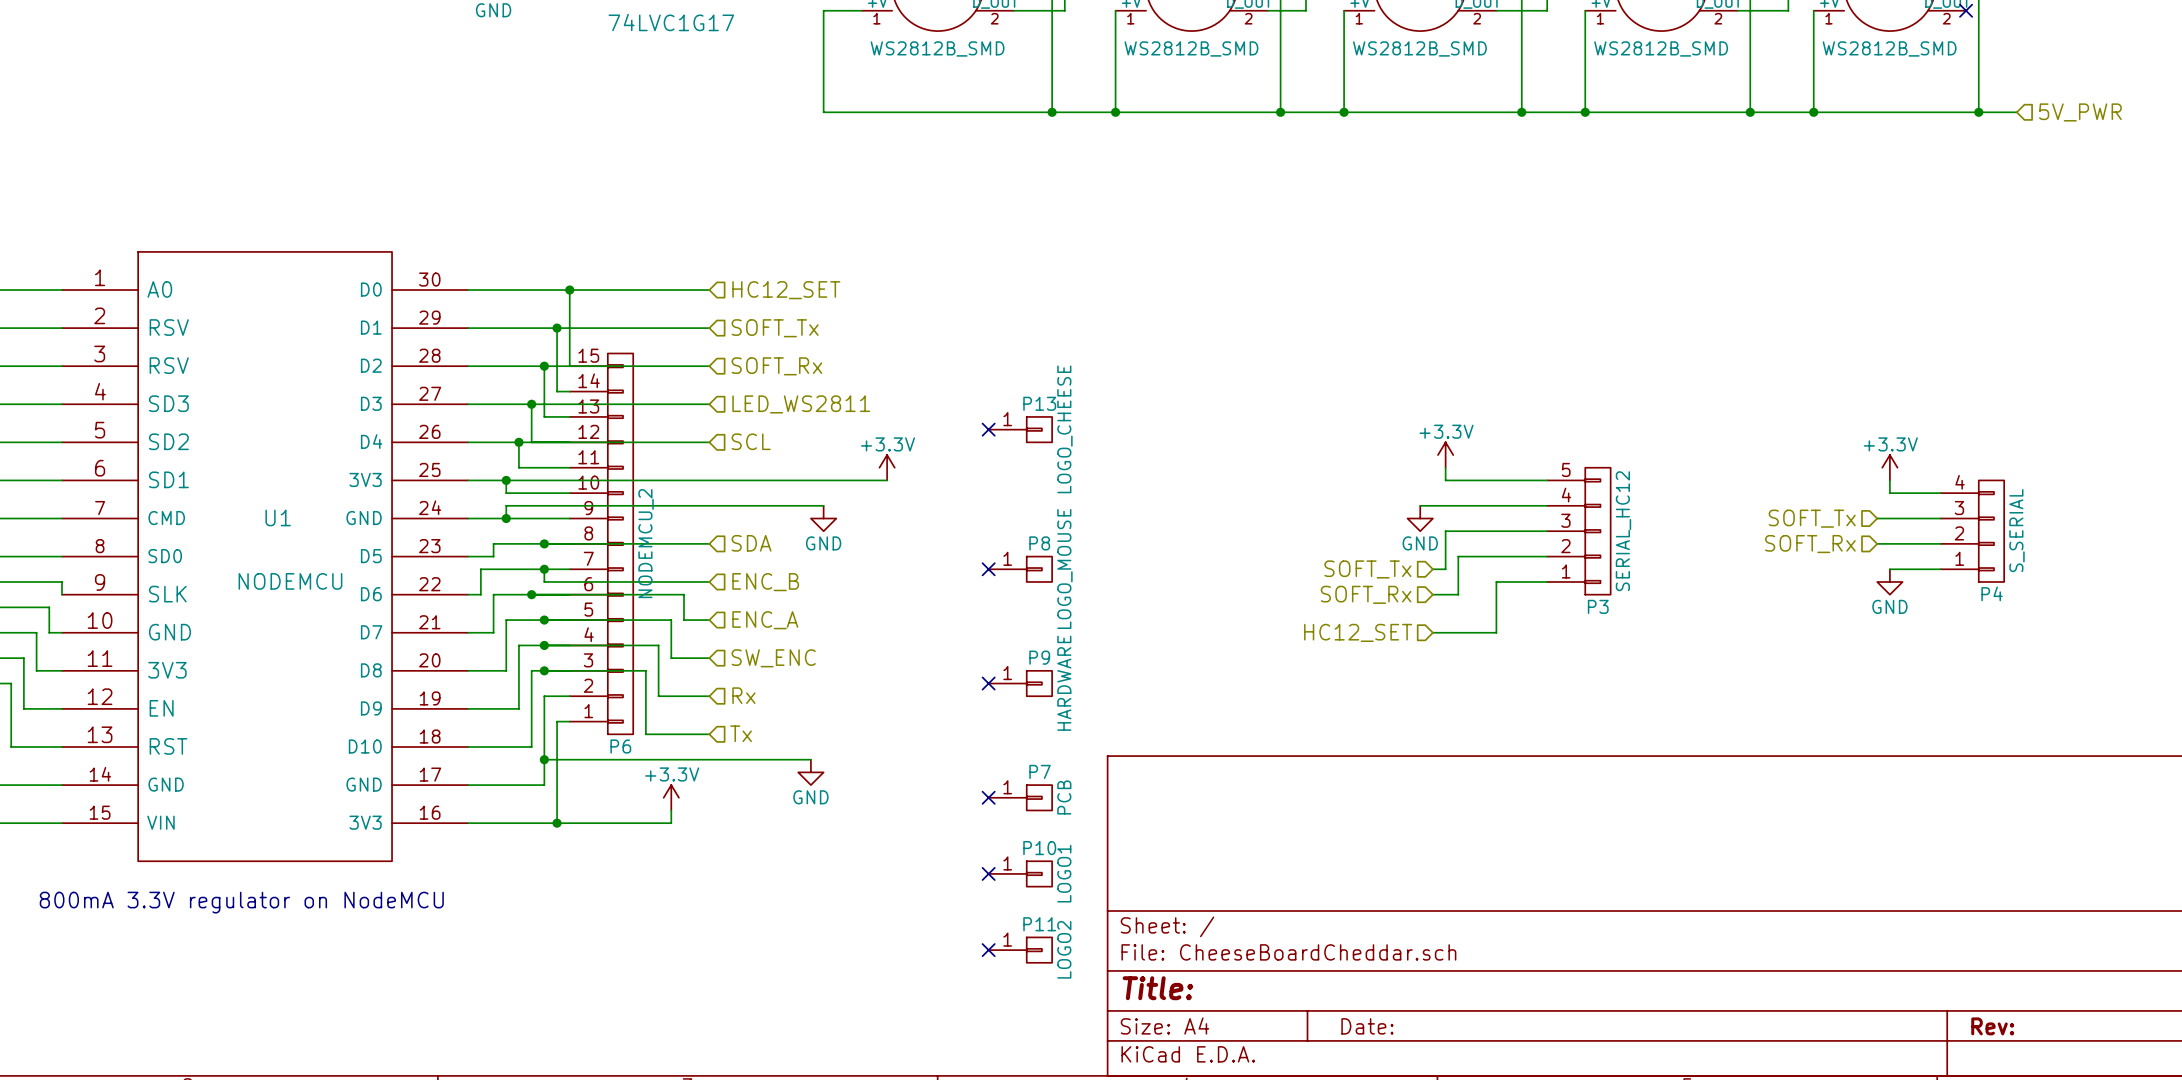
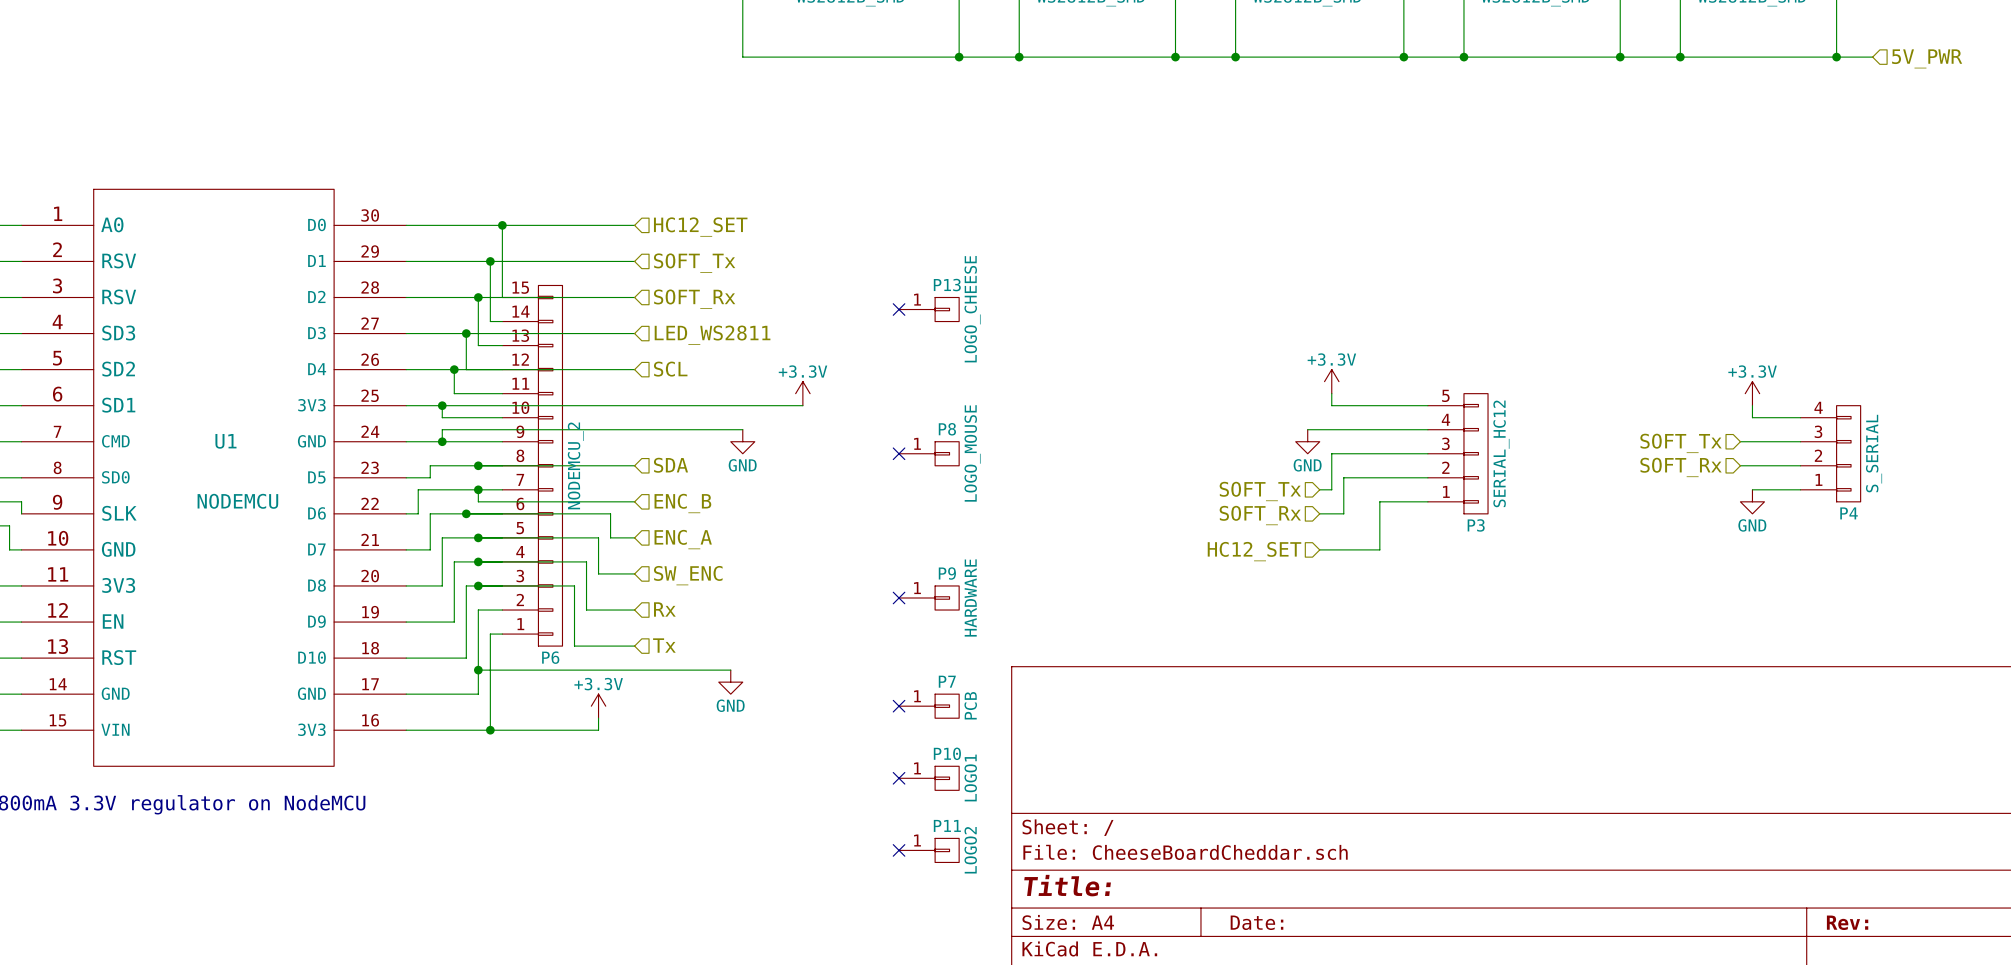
no-connect mark: none -> (899, 309)
no-connect mark: (988, 429) -> none
P13 position: (1020, 429) -> (929, 309)
no-connect mark position: (988, 569) -> (899, 453)
P8 position: (1020, 569) -> (929, 453)

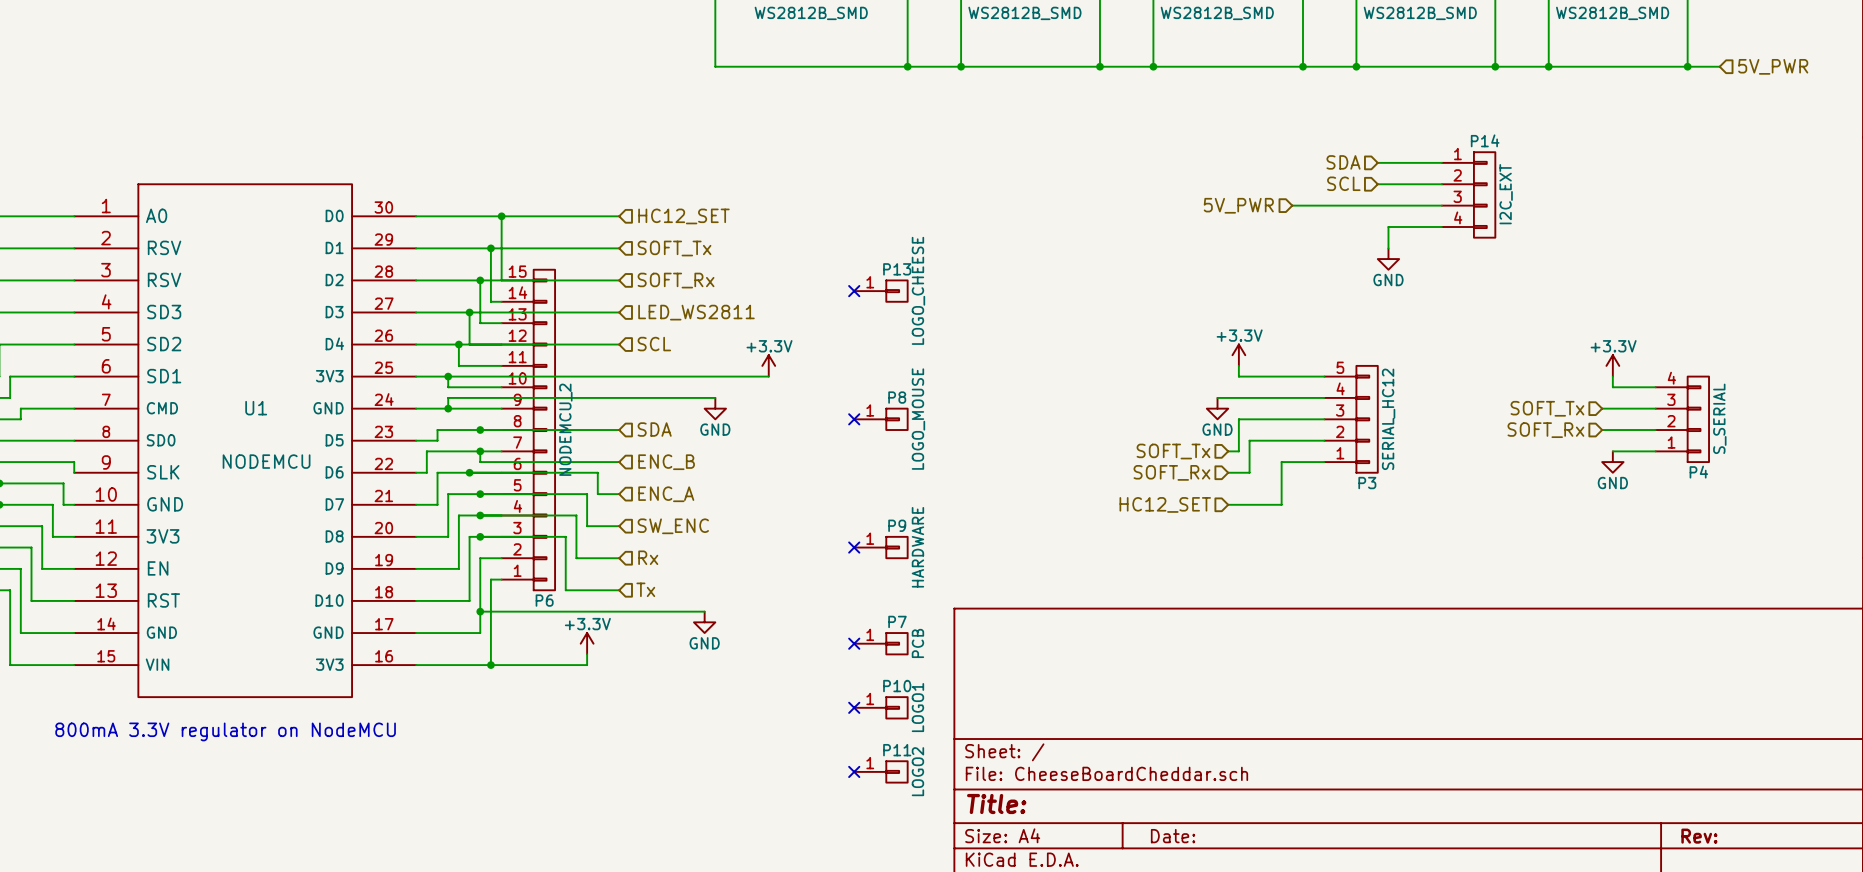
hierarchical label: none -> SDA (1343, 162)
wire: none -> (1377, 162) (1441, 162)
hierarchical label: none -> SCL (1343, 183)
wire: none -> (1377, 184) (1441, 184)
P14: none -> I2C_EXT (1468, 194)
wire: none -> (1292, 205) (1441, 205)
hierarchical label: none -> 5V_PWR (1238, 205)
wire: none -> (1441, 227) (1388, 227) (1388, 248)
power symbol: none -> GND (1388, 259)

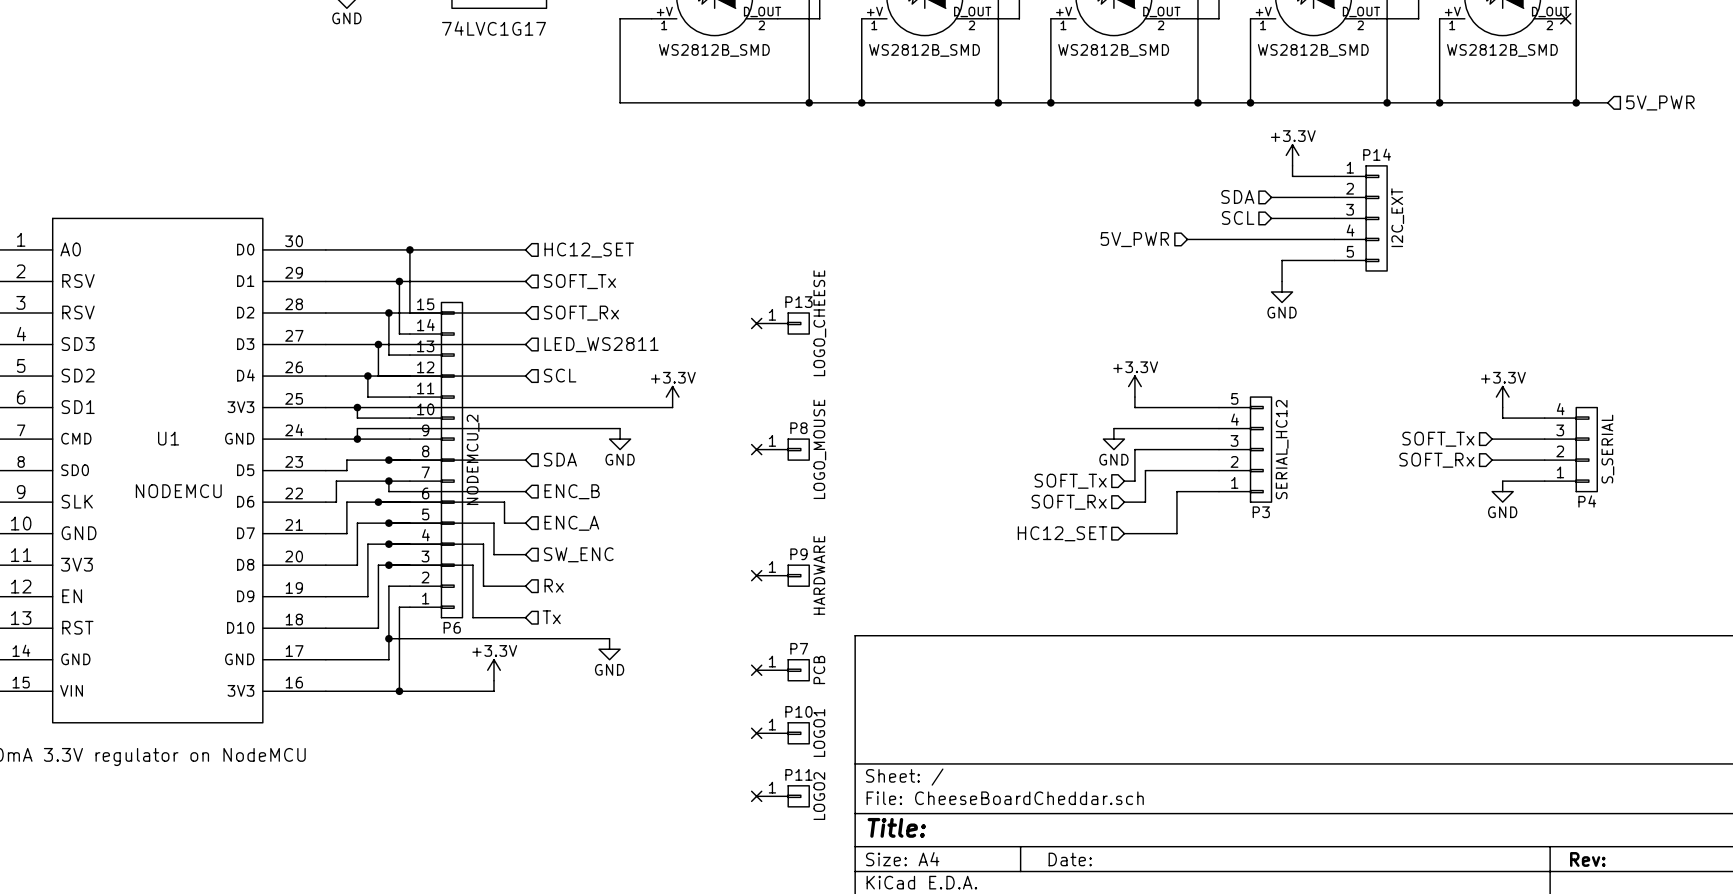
power symbol: none -> +3.3V (1292, 155)
wire: none -> (1292, 165) (1292, 176) (1334, 176)
P14 symbol: [1441, 152, 1496, 238] -> [1334, 165, 1388, 271]

